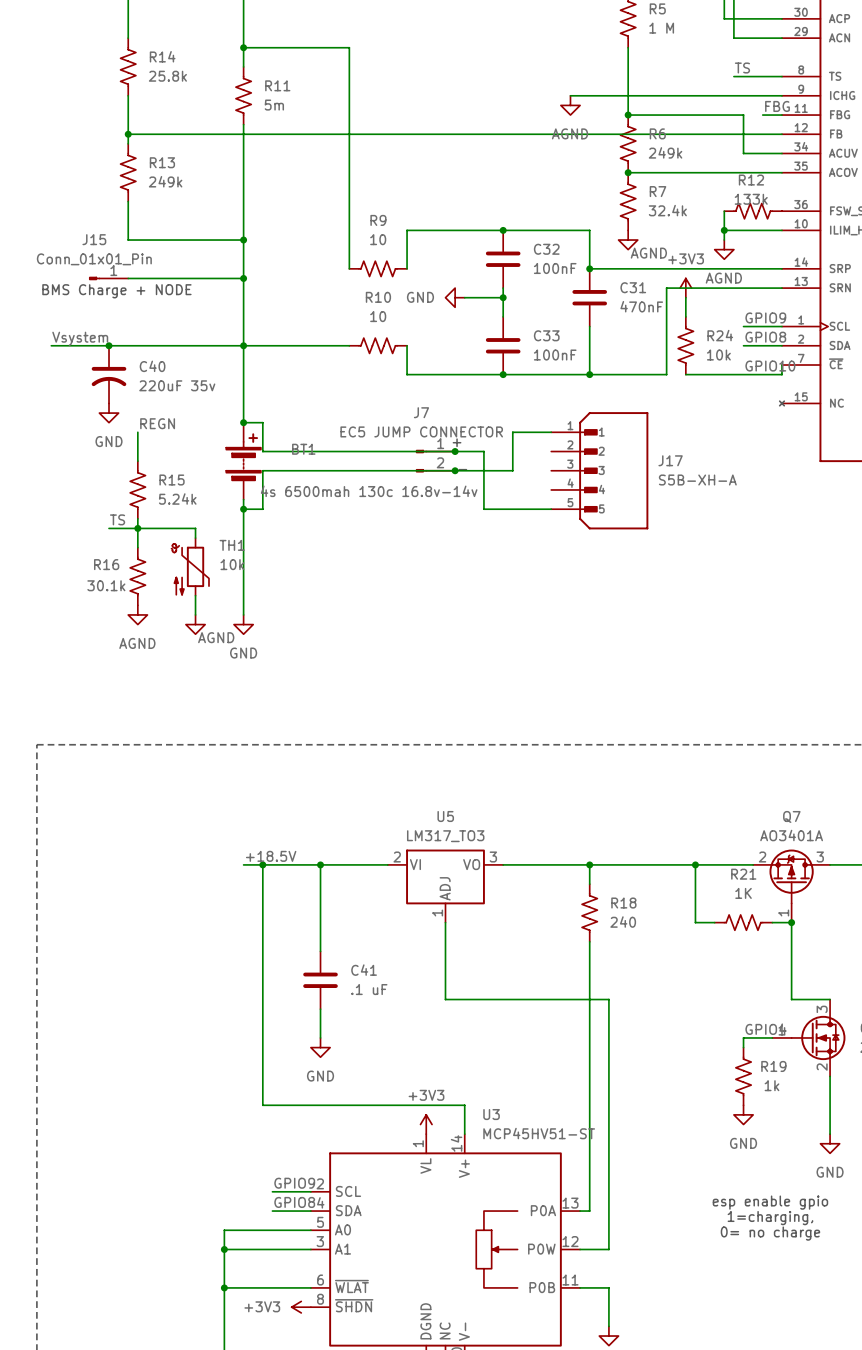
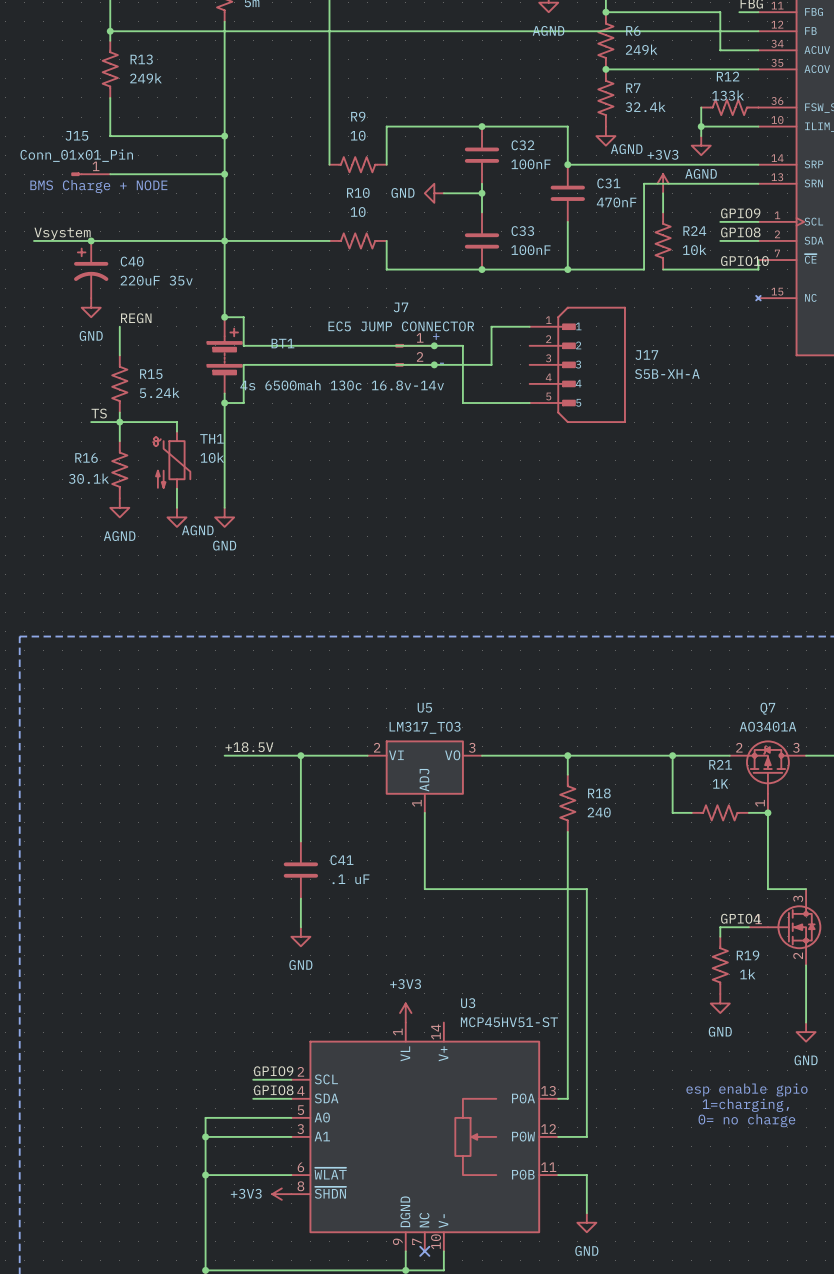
C40 symbol: [91, 345, 127, 404] -> [74, 240, 109, 299]
wire: (262, 864) (262, 1105) (464, 1105) (464, 1134) -> none
junction: (262, 864) -> none

